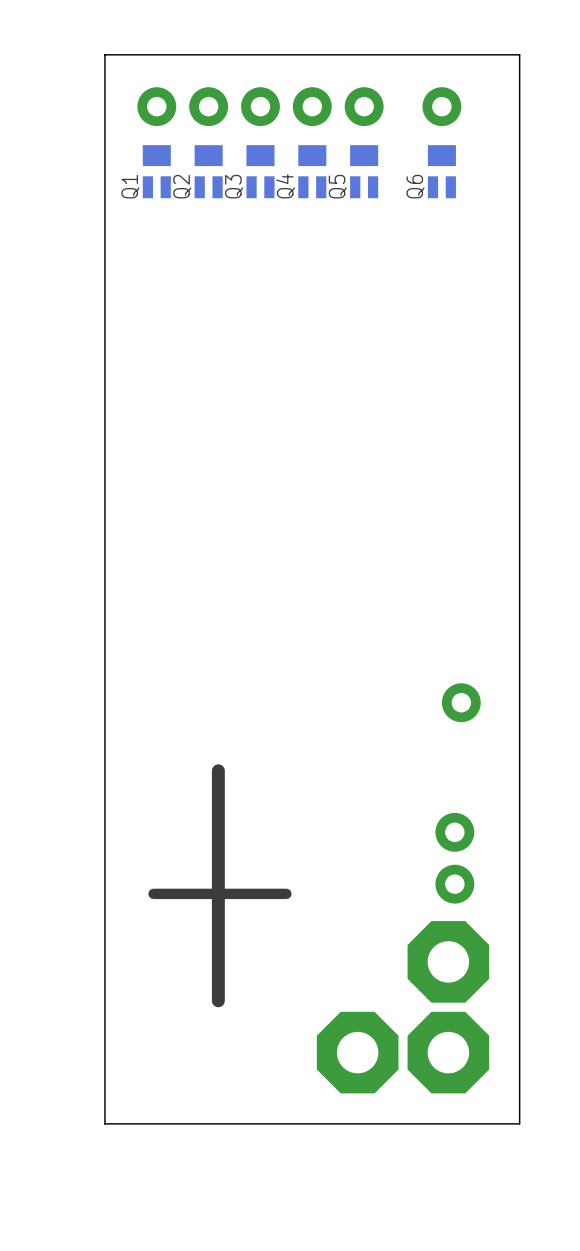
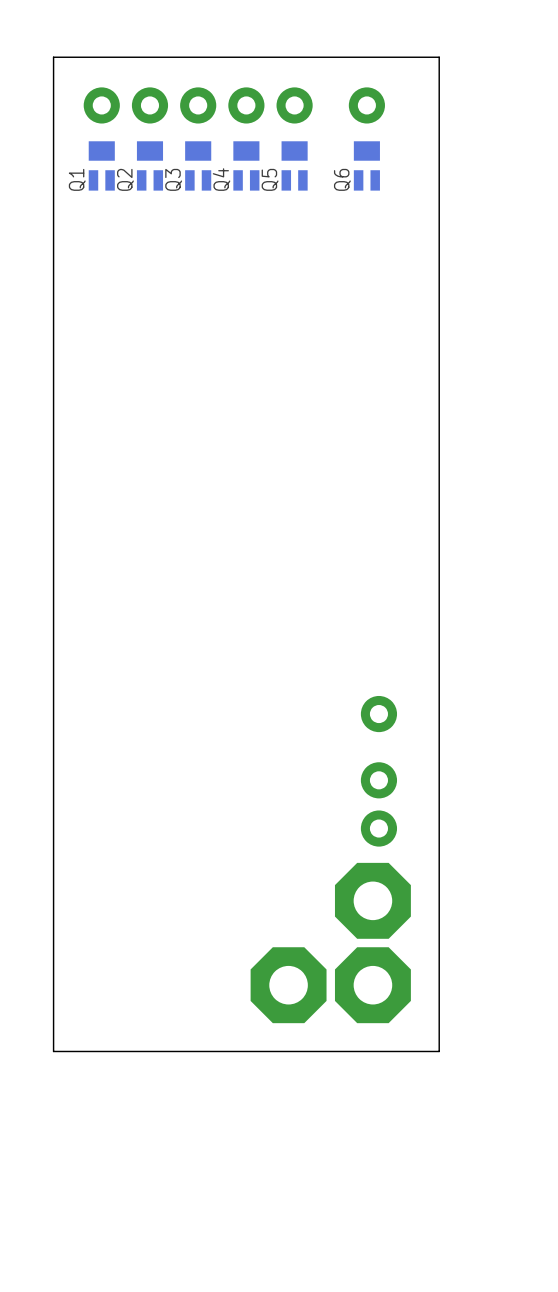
part position: (461, 702) -> (378, 714)
line: (218, 770) (218, 1000) -> none
line: (286, 893) (153, 893) -> none

